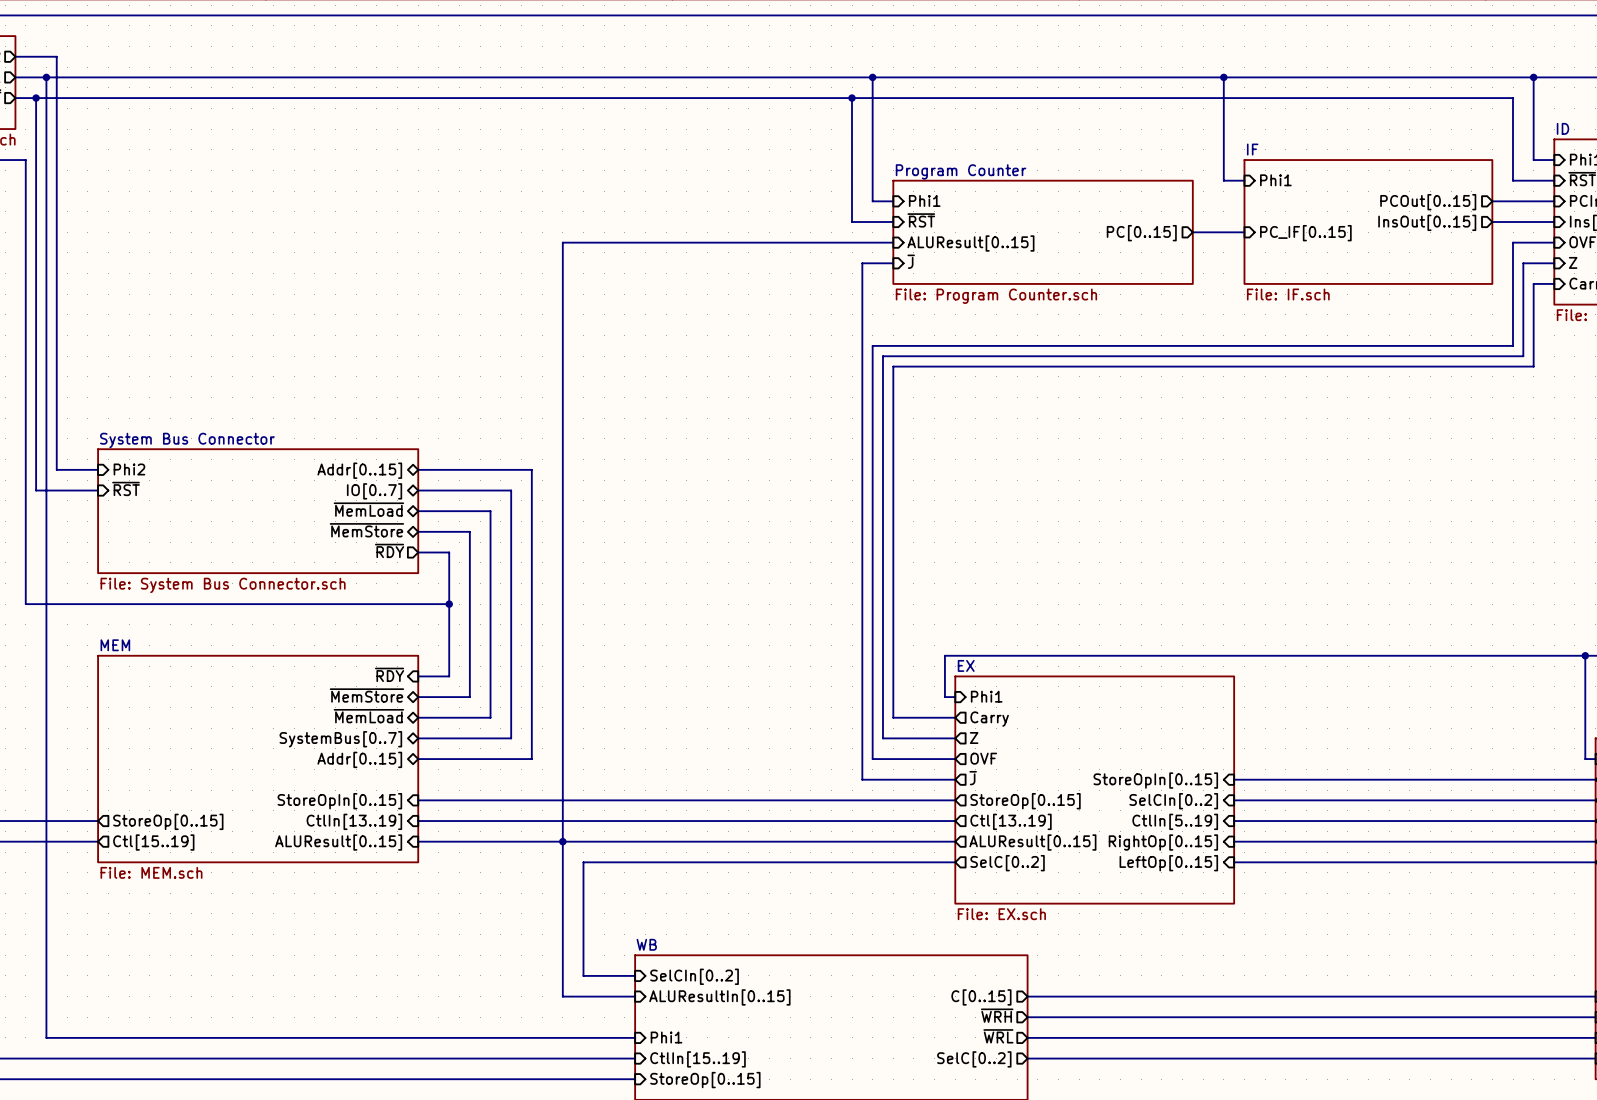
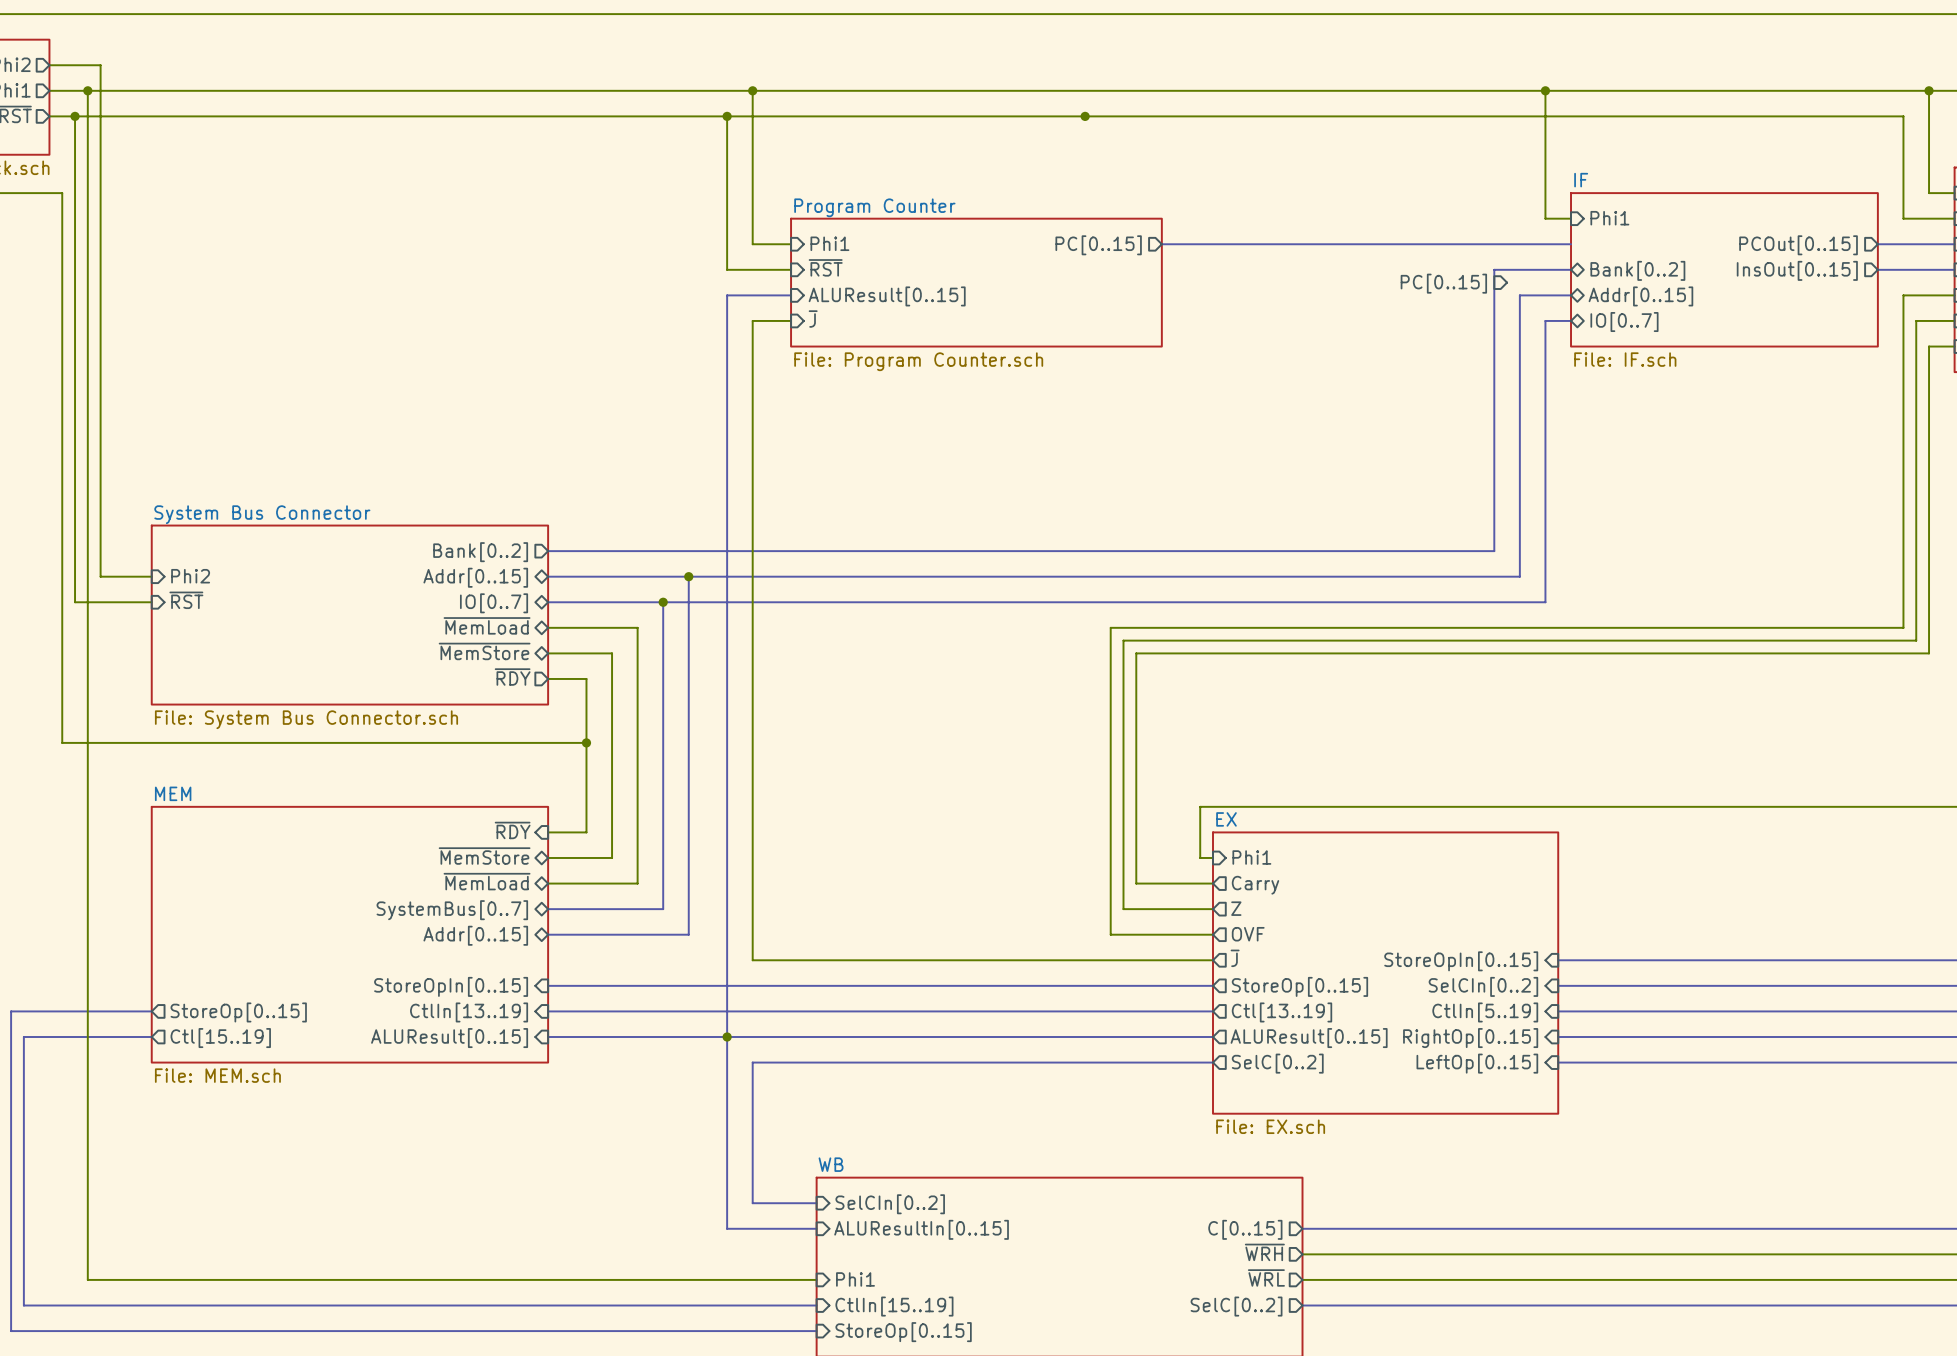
wire: none -> (752, 90) (752, 244) (791, 244)
junction: none -> (752, 90)
wire: (872, 77) (872, 201) (893, 201) -> none
junction: (872, 77) -> none
wire: none -> (727, 116) (727, 269) (791, 269)
junction: none -> (727, 116)
wire: (852, 98) (852, 221) (893, 221) -> none
sheet pin: none -> Phi1 (829, 243)
sheet pin shape: input (924, 200) -> output (1098, 245)
sheet pin: Phi1 (924, 200) -> PC[0..15] (1098, 245)
bus: none -> (1161, 244) (1571, 244)
sheet pin: none -> ~{RST} (825, 267)
sheet pin: ~{RST} (921, 220) -> none
bus: none -> (1571, 269) (1494, 269) (1494, 551) (548, 551)
sheet pin: none -> Bank[0..2] (1637, 270)
sheet Program Counter: none -> File: Program Counter.sch (976, 282)
sheet Program Counter: File: Program Counter.sch (1043, 232) -> none
bus: (1192, 232) (1244, 232) -> none
sheet pin shape: input (1305, 233) -> bidirectional (1640, 296)
sheet pin: PC_IF[0..15] (1305, 233) -> Addr[0..15] (1640, 296)
bus: (614, 242) (893, 242) -> none
bus: none -> (1571, 295) (1519, 295) (1519, 576) (688, 576)
sheet pin: none -> ALUResult[0..15] (887, 296)
sheet pin: ALUResult[0..15] (970, 243) -> none
sheet pin: none -> ~{J} (813, 319)
sheet pin: ~{J} (911, 261) -> none
wire: (893, 263) (862, 263) (862, 779) -> (791, 320) (752, 320) (752, 960) (1097, 960)
bus: none -> (1571, 320) (1545, 320) (1545, 602) (663, 602)
sheet pin: none -> IO[0..7] (1624, 322)
wire: (1513, 345) (872, 345) (872, 511) -> (1903, 423) (1903, 627) (1110, 627)
wire: (1523, 356) (882, 356) (882, 521) -> (1916, 436) (1916, 640) (1123, 640)
wire: (1533, 366) (893, 366) (893, 531) -> (1929, 448) (1929, 653) (1136, 653)
sheet pin: none -> Bank[0..2] (480, 552)
junction: none -> (688, 576)
junction: none -> (663, 602)
sheet System Bus Connector: none -> File: System Bus Connector.sch (349, 615)
sheet System Bus Connector: File: System Bus Connector.sch (258, 511) -> none

